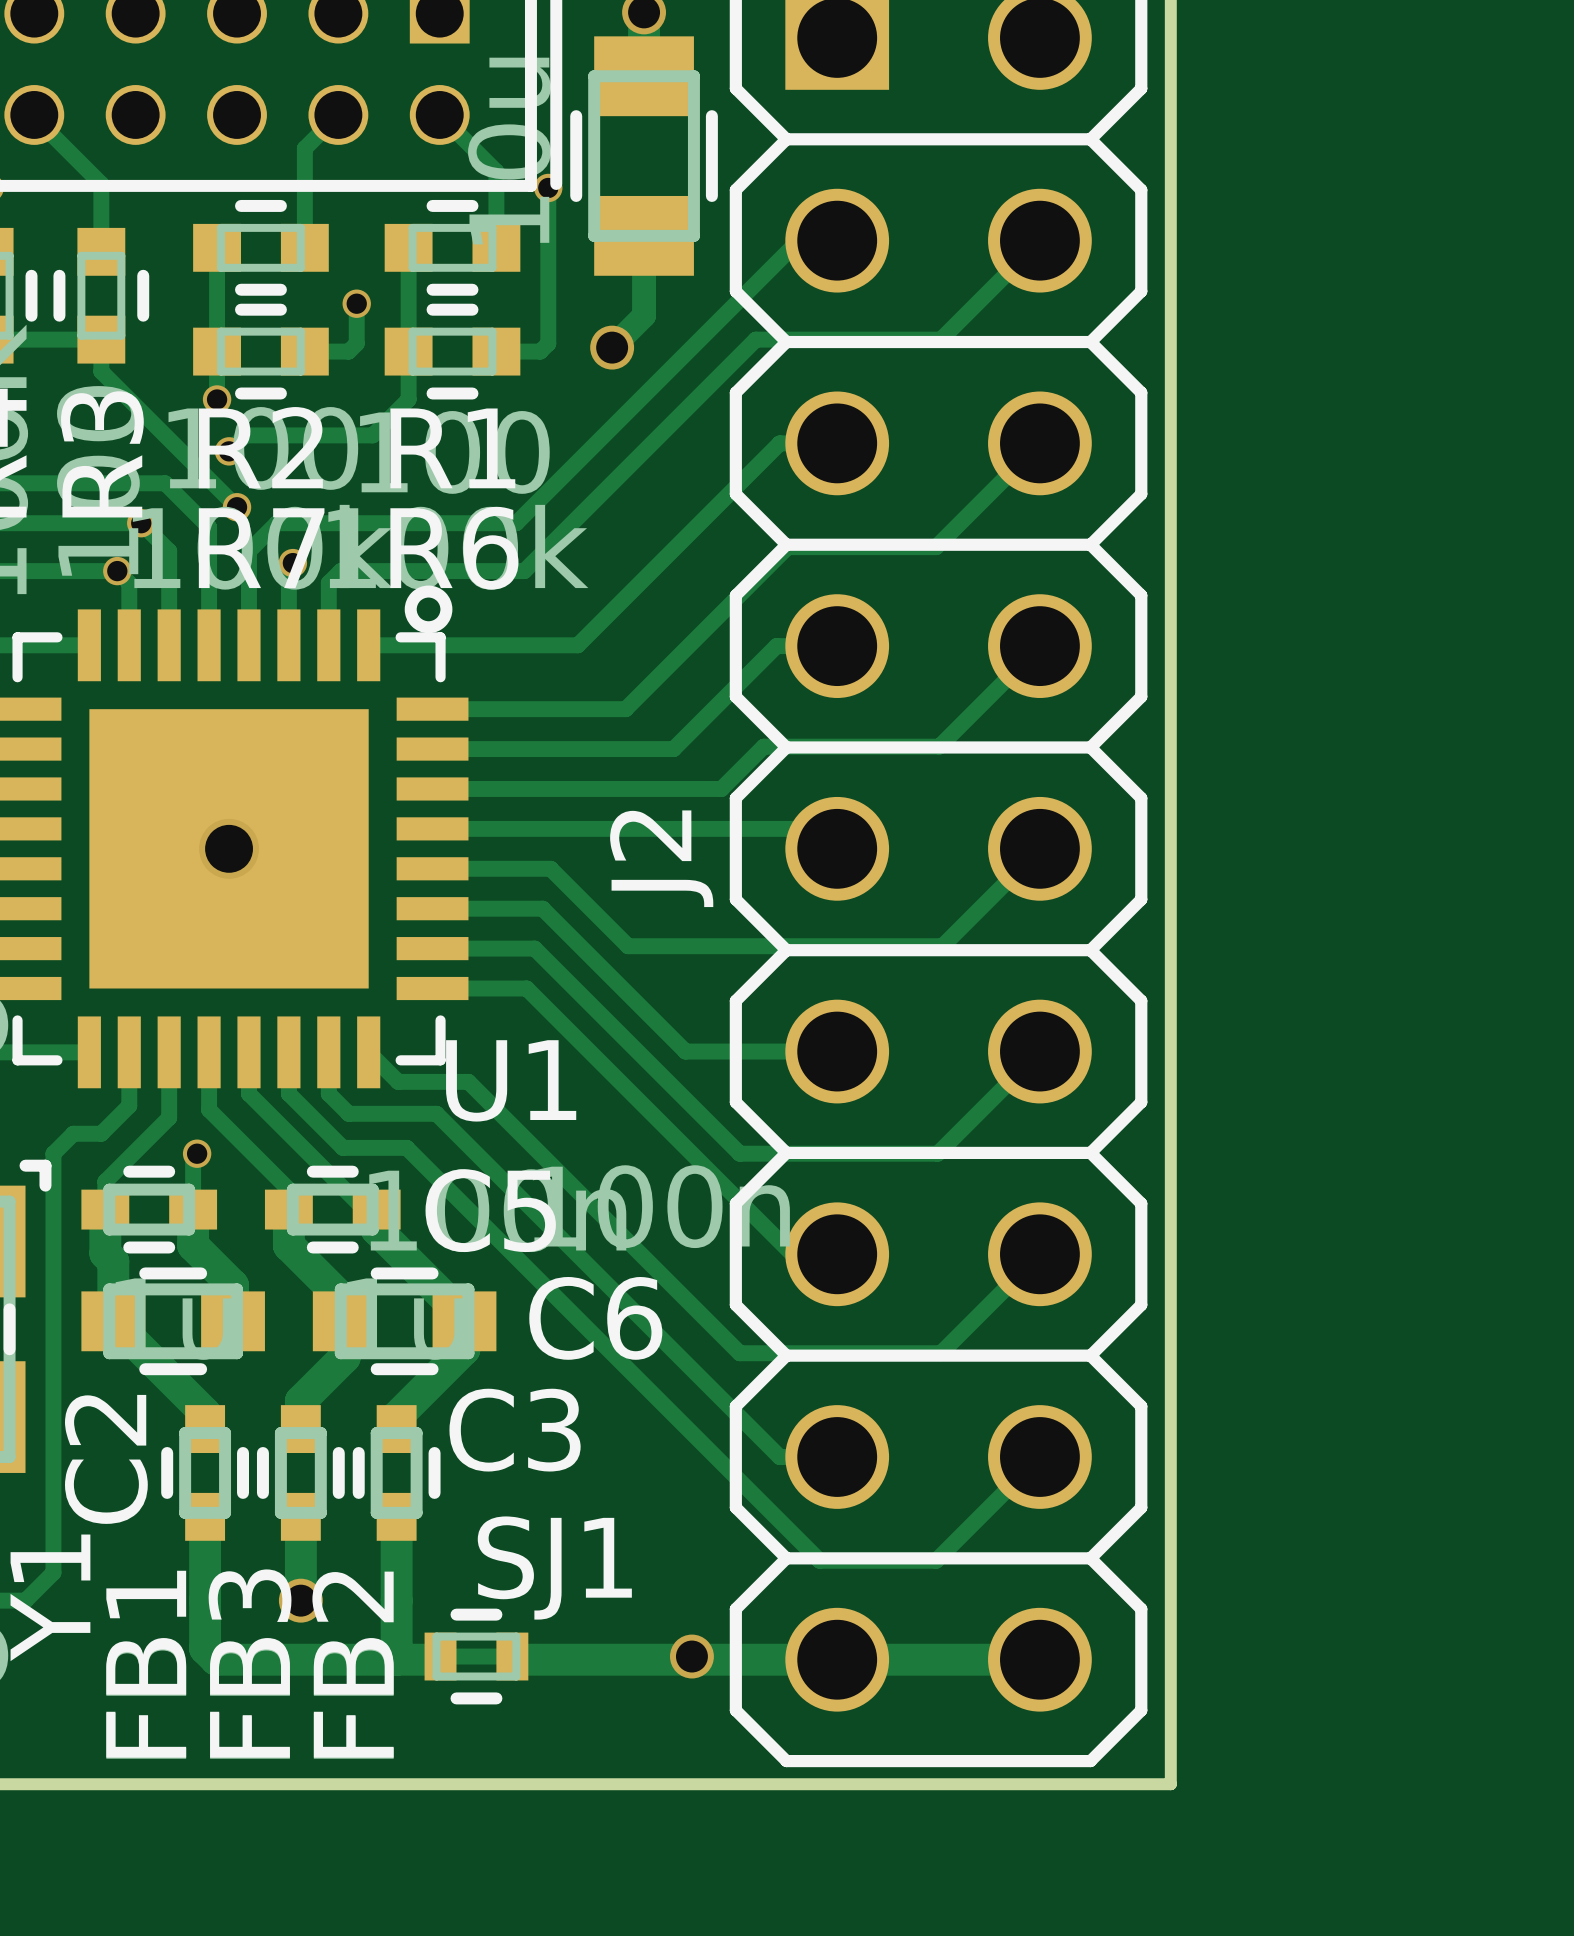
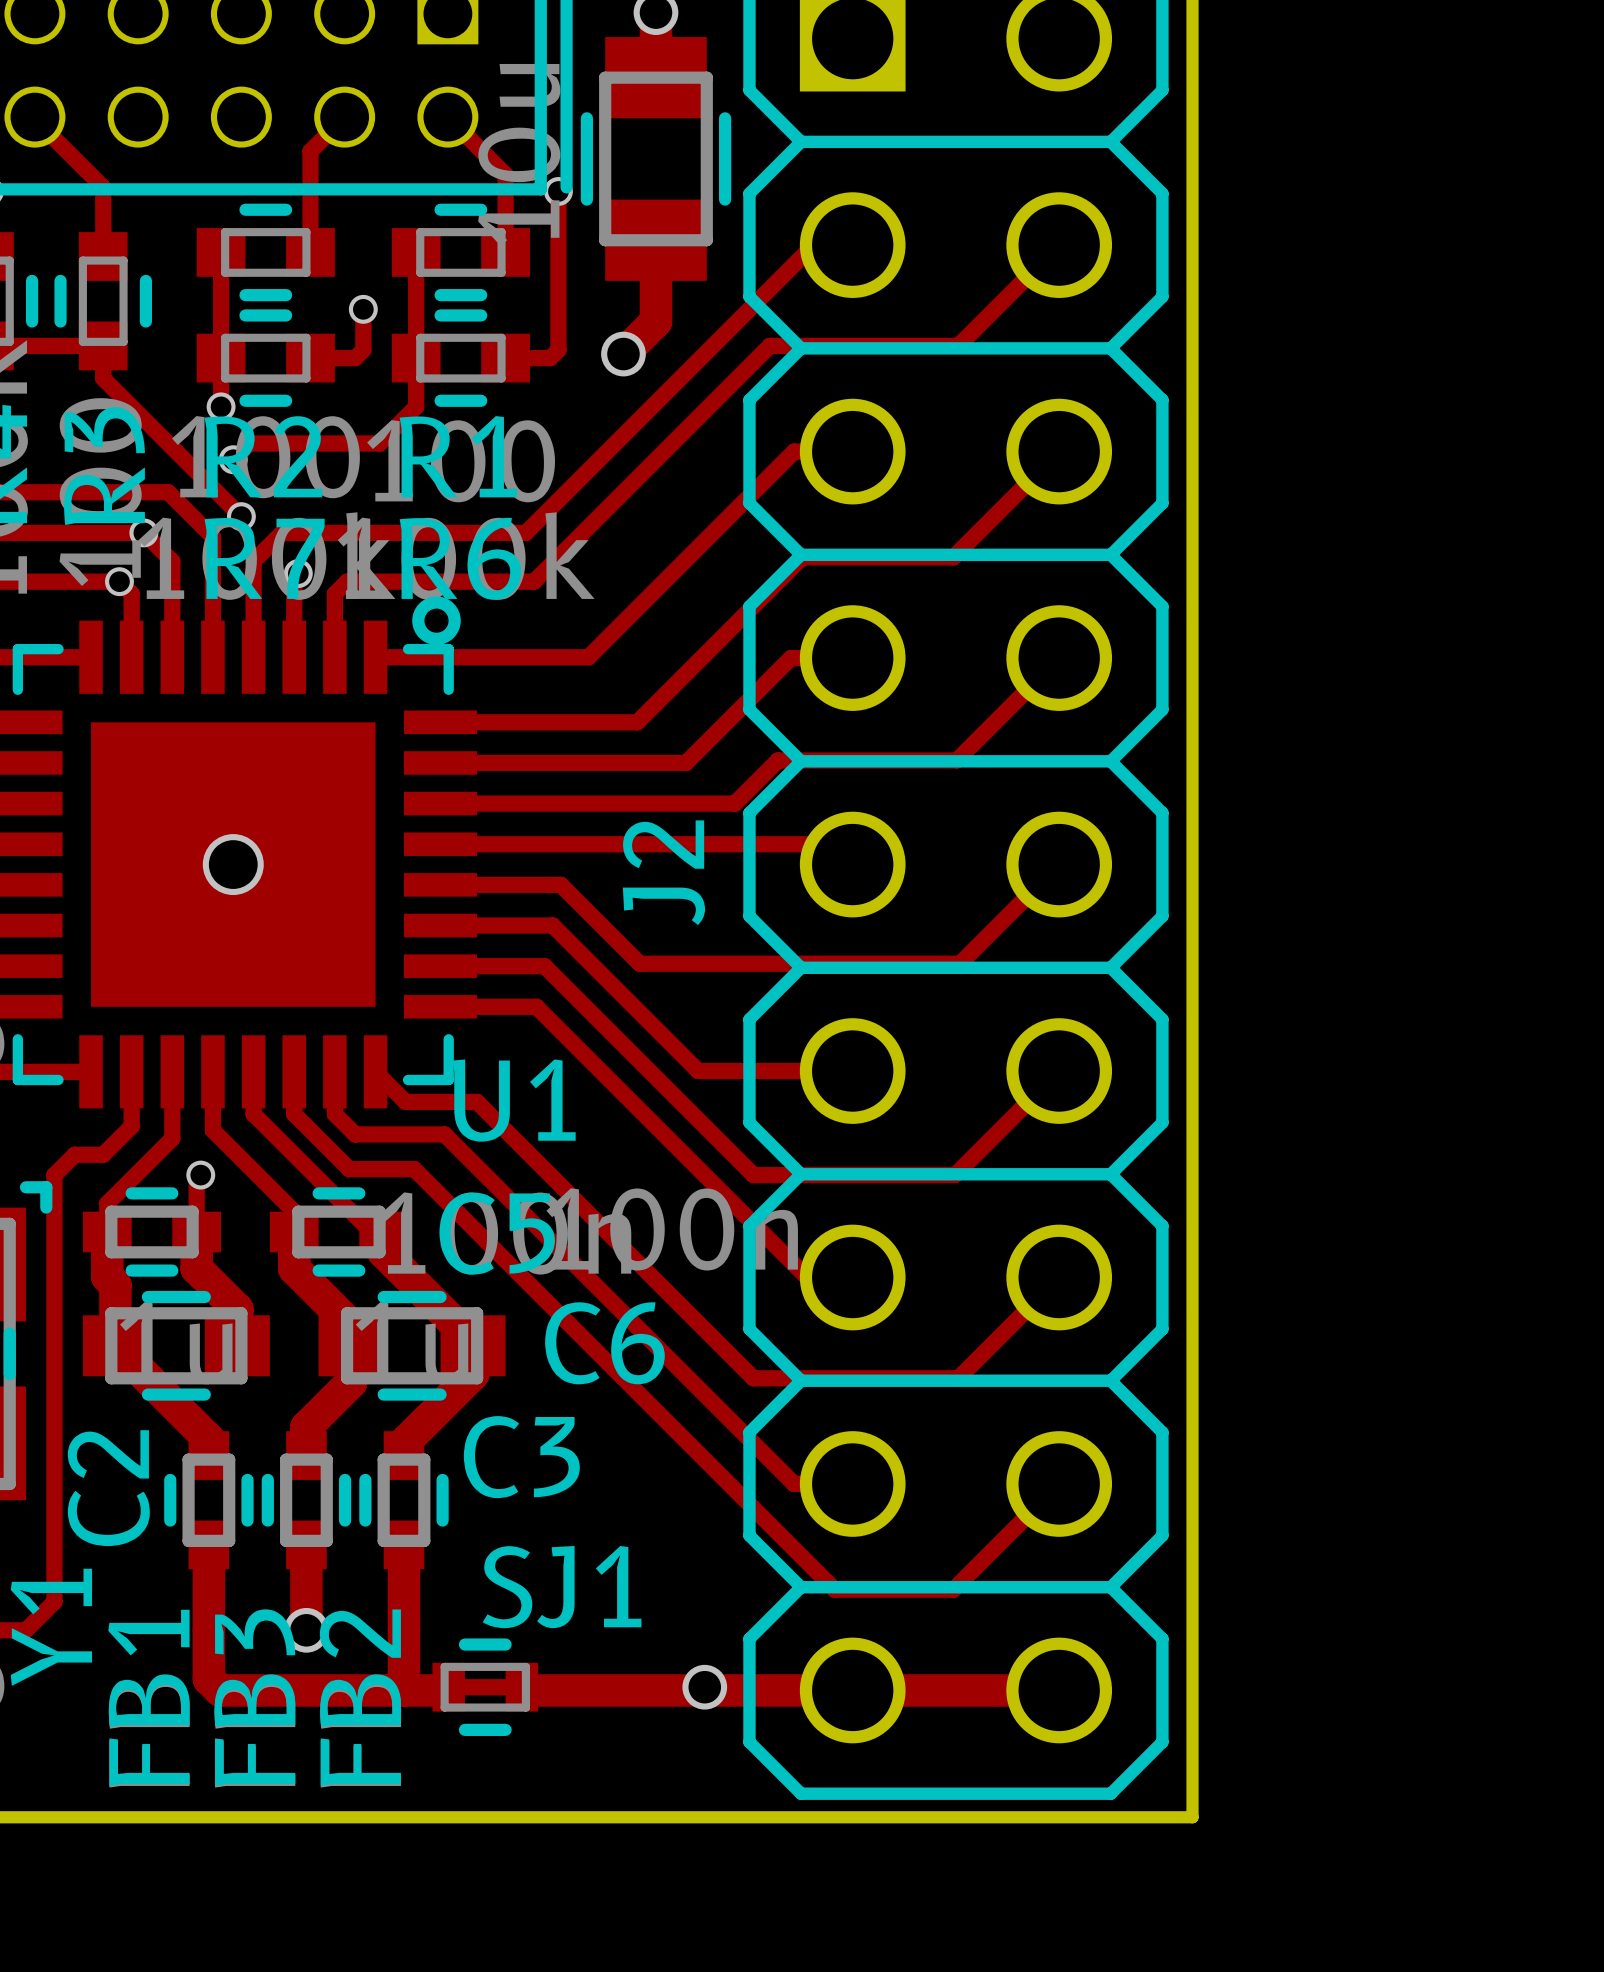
track width: thin (644, 251) (644, 315) (612, 347) -> thick (655, 256) (655, 321) (623, 354)

